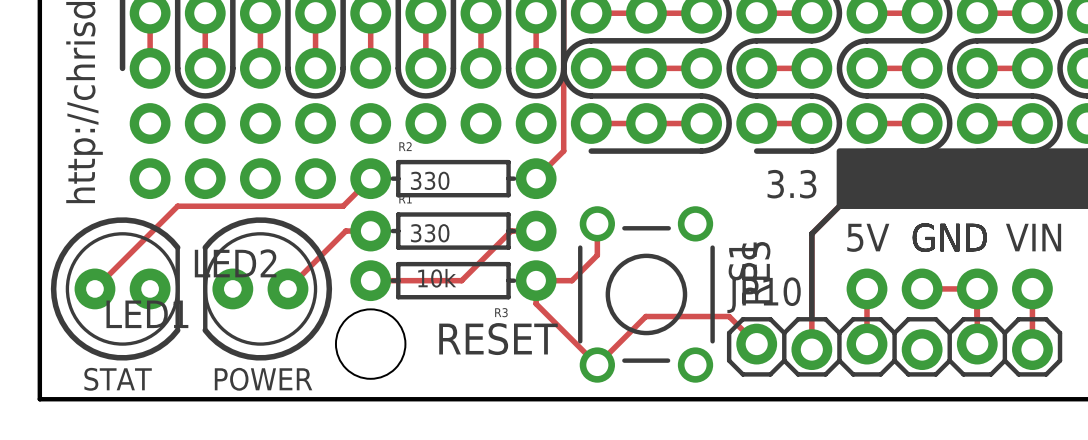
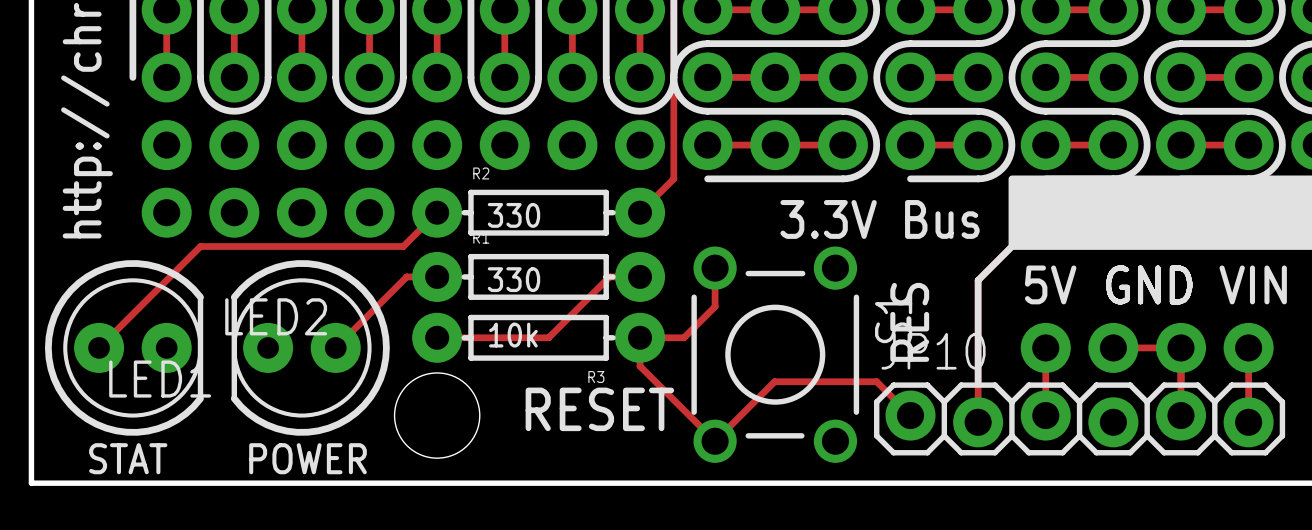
text: none -> 3.3V Bus (880, 219)
text: 3.3 (791, 184) -> none

